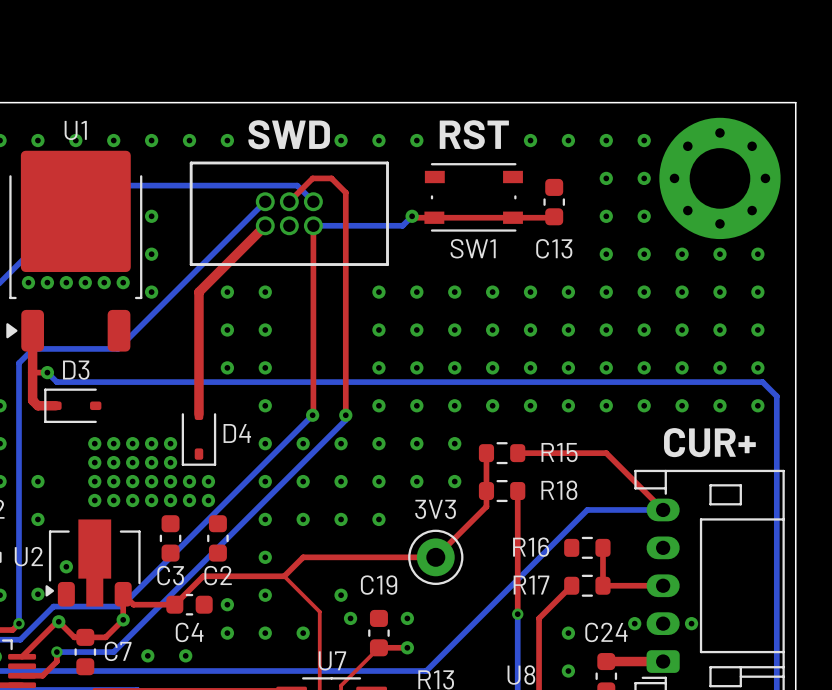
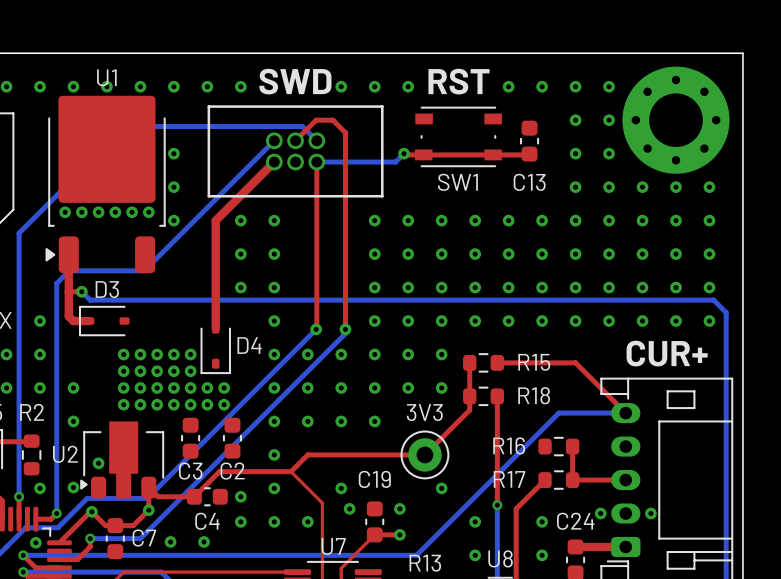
via: none -> (441, 488)
via: none -> (475, 521)
via: none -> (475, 555)

